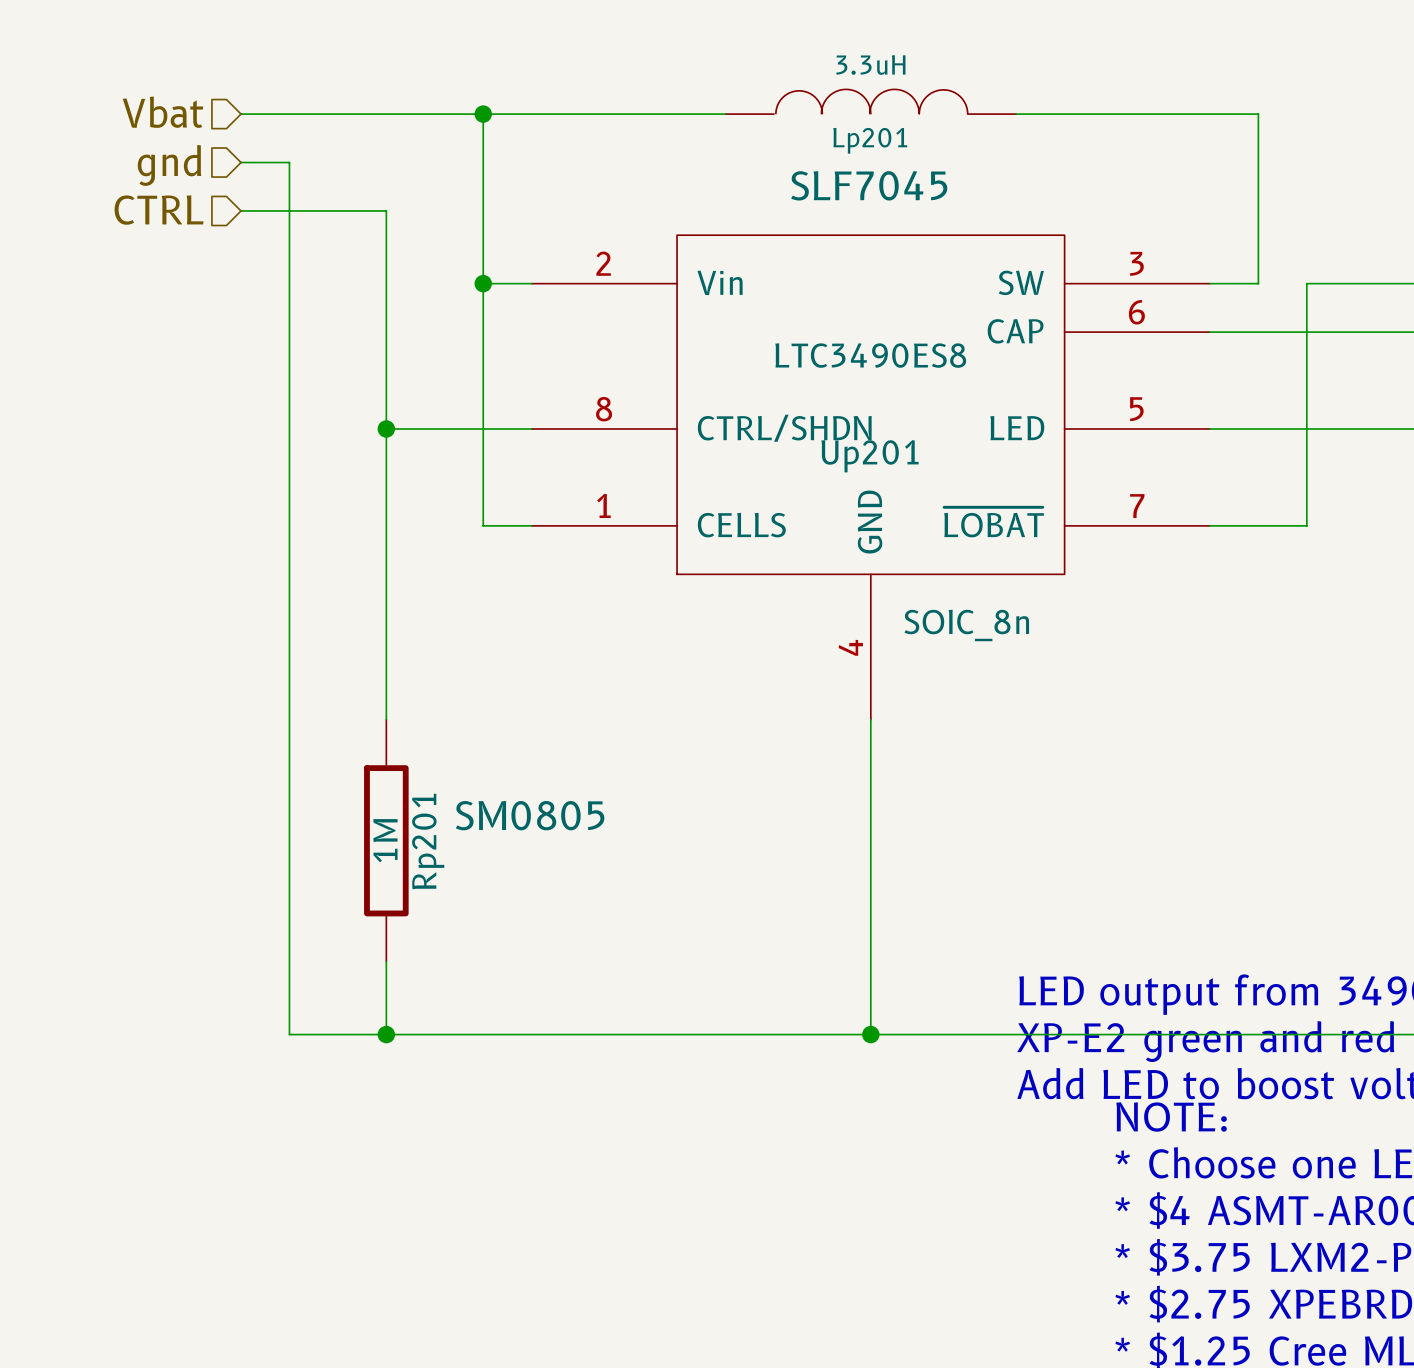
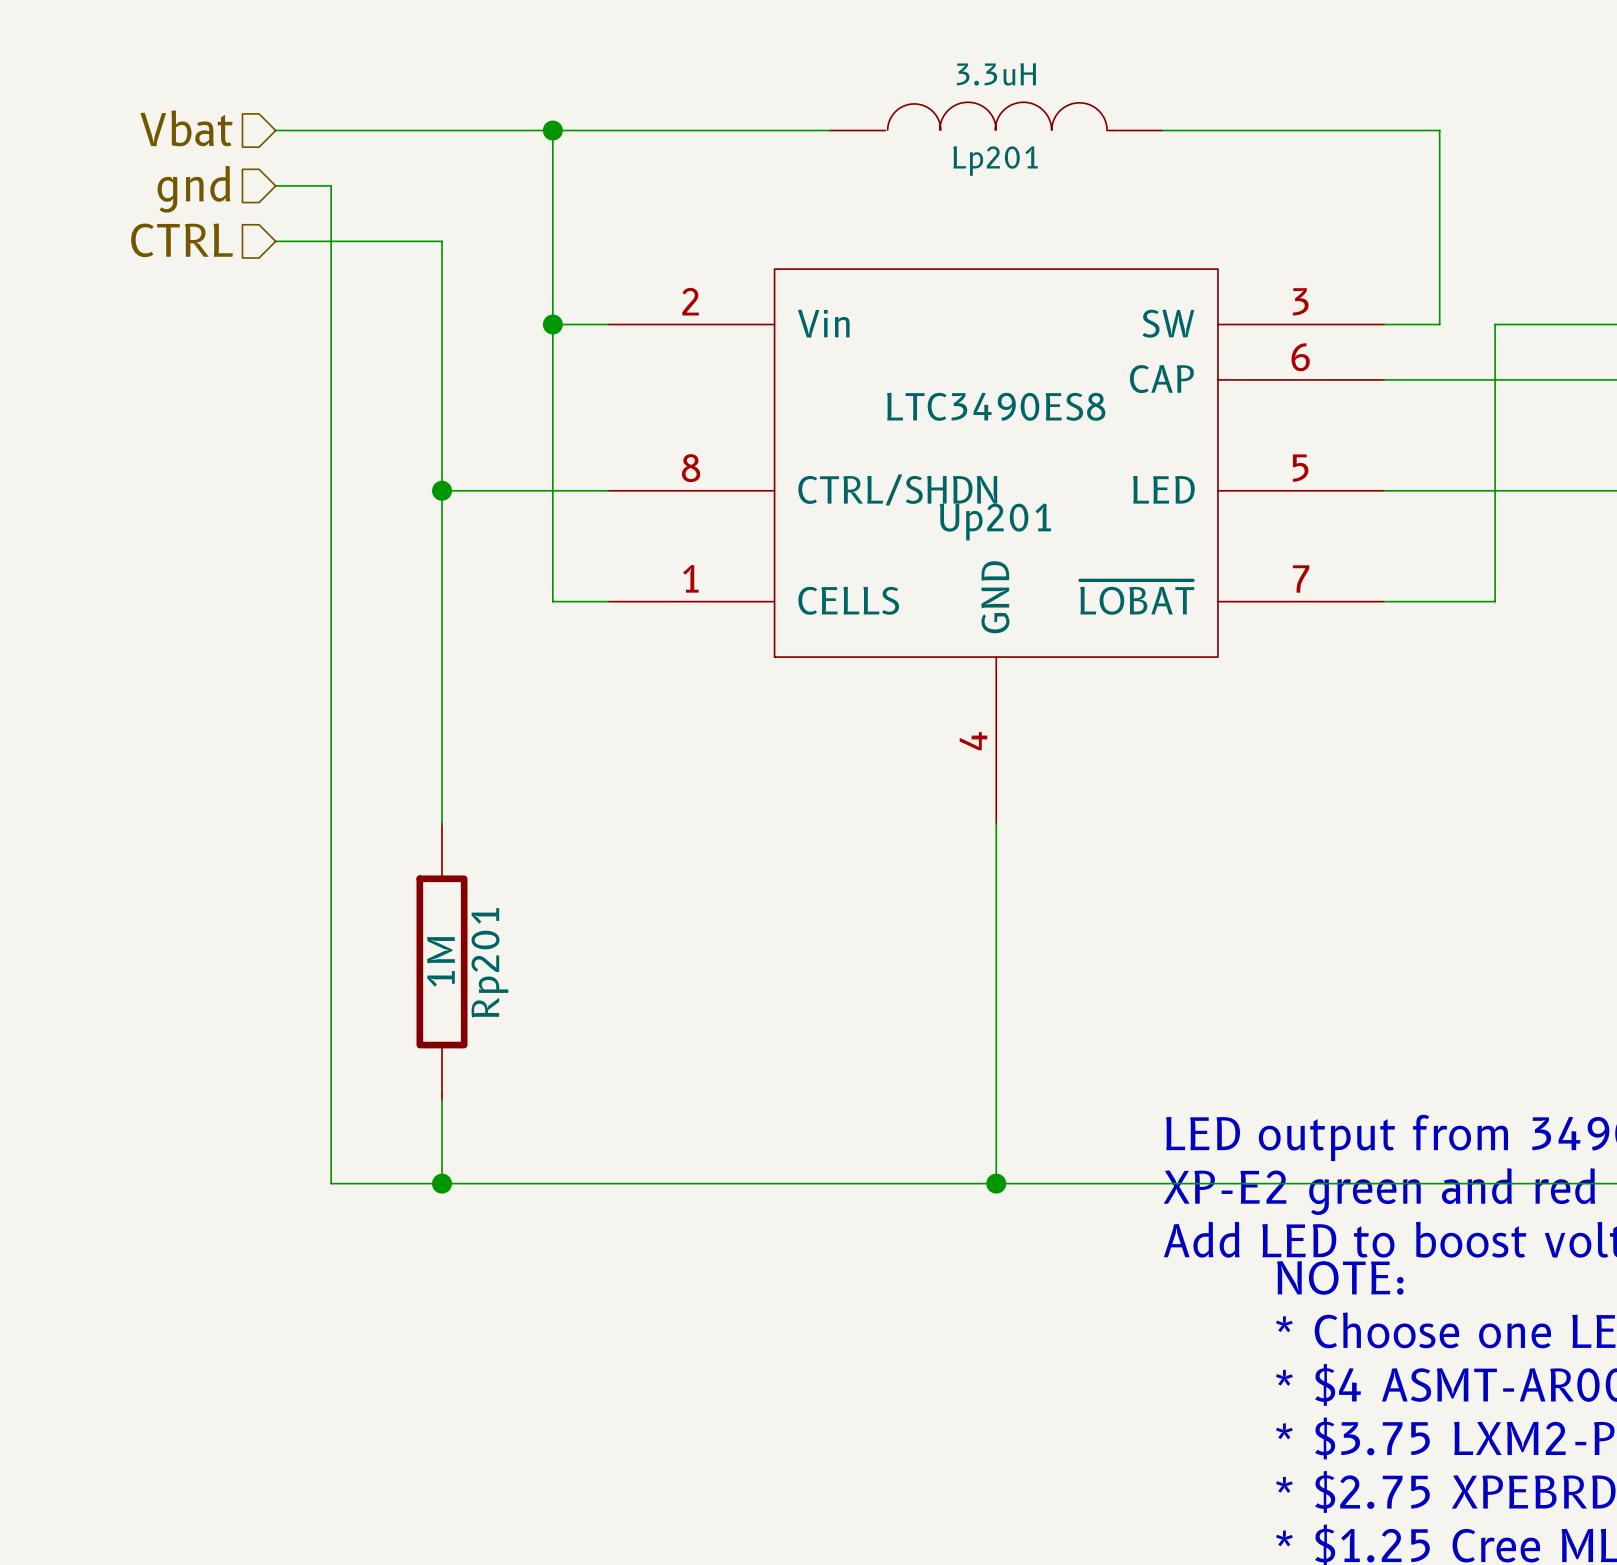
Lp201 text: SLF7045 (869, 185) -> none
Up201 text: SOIC_8n (966, 625) -> none
Rp201 text: SM0805 (530, 815) -> none

